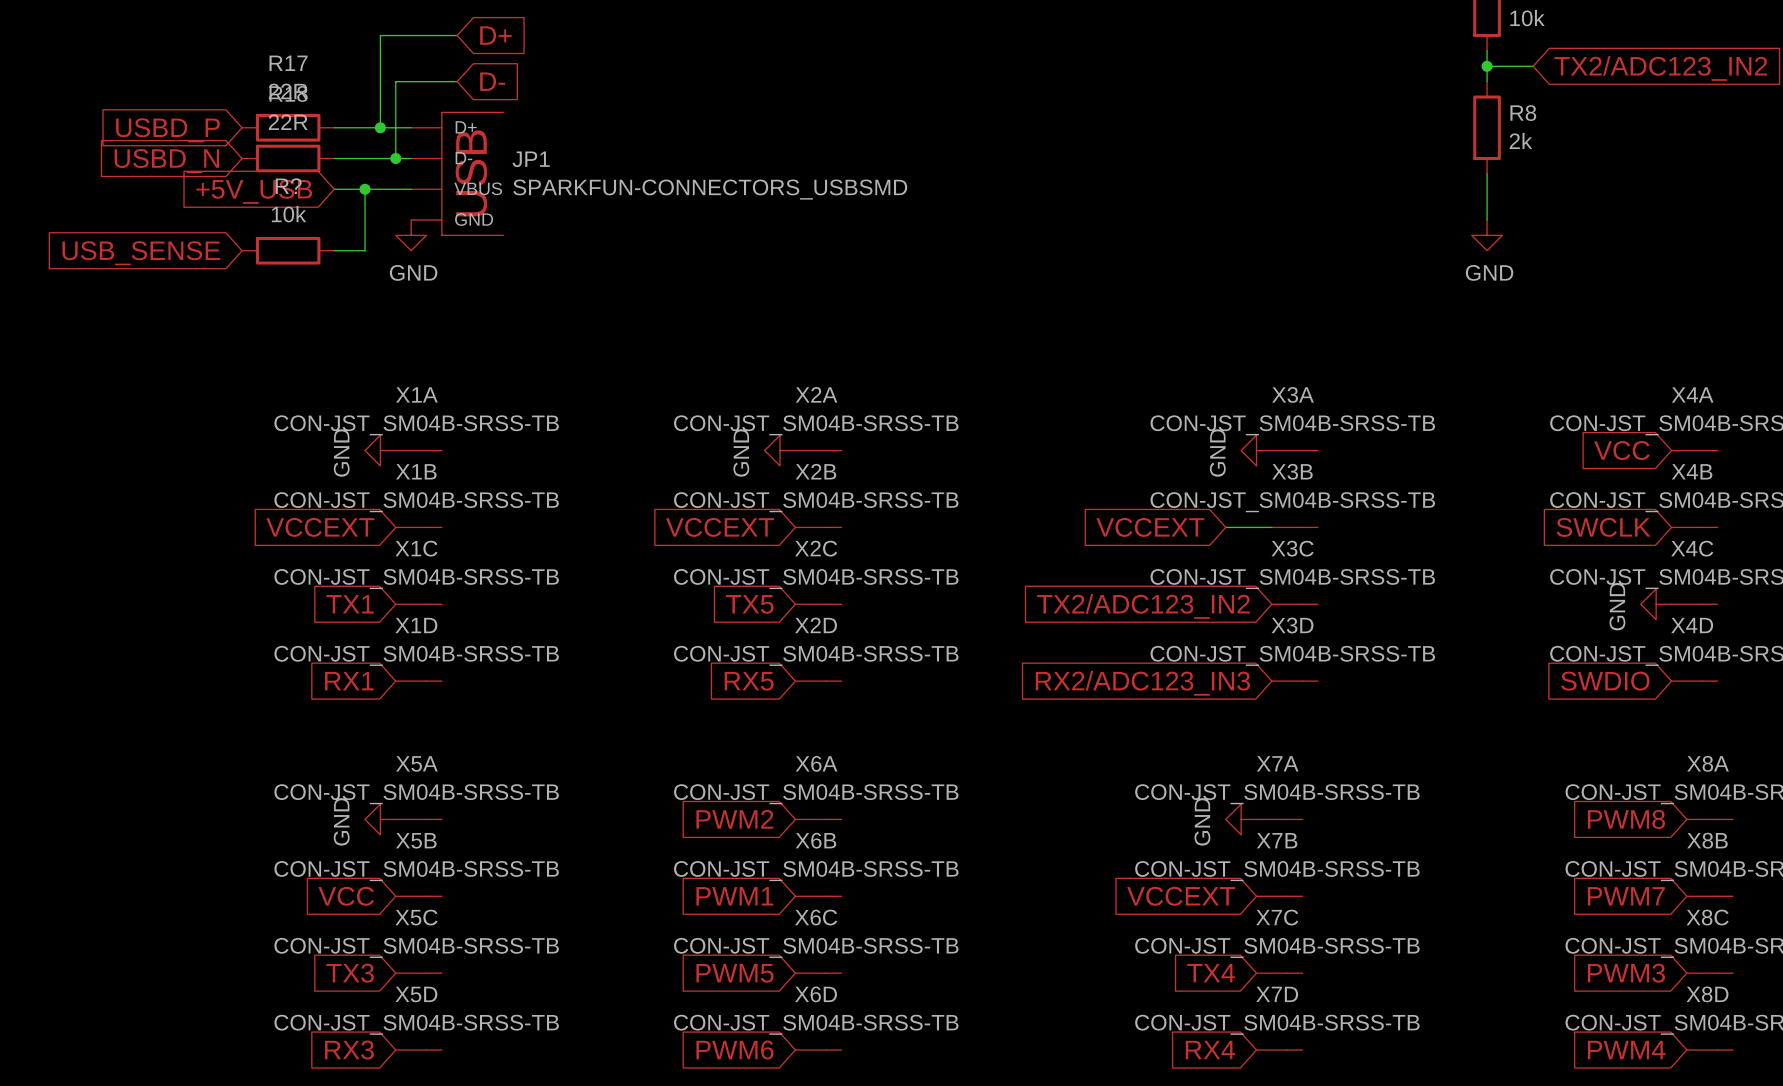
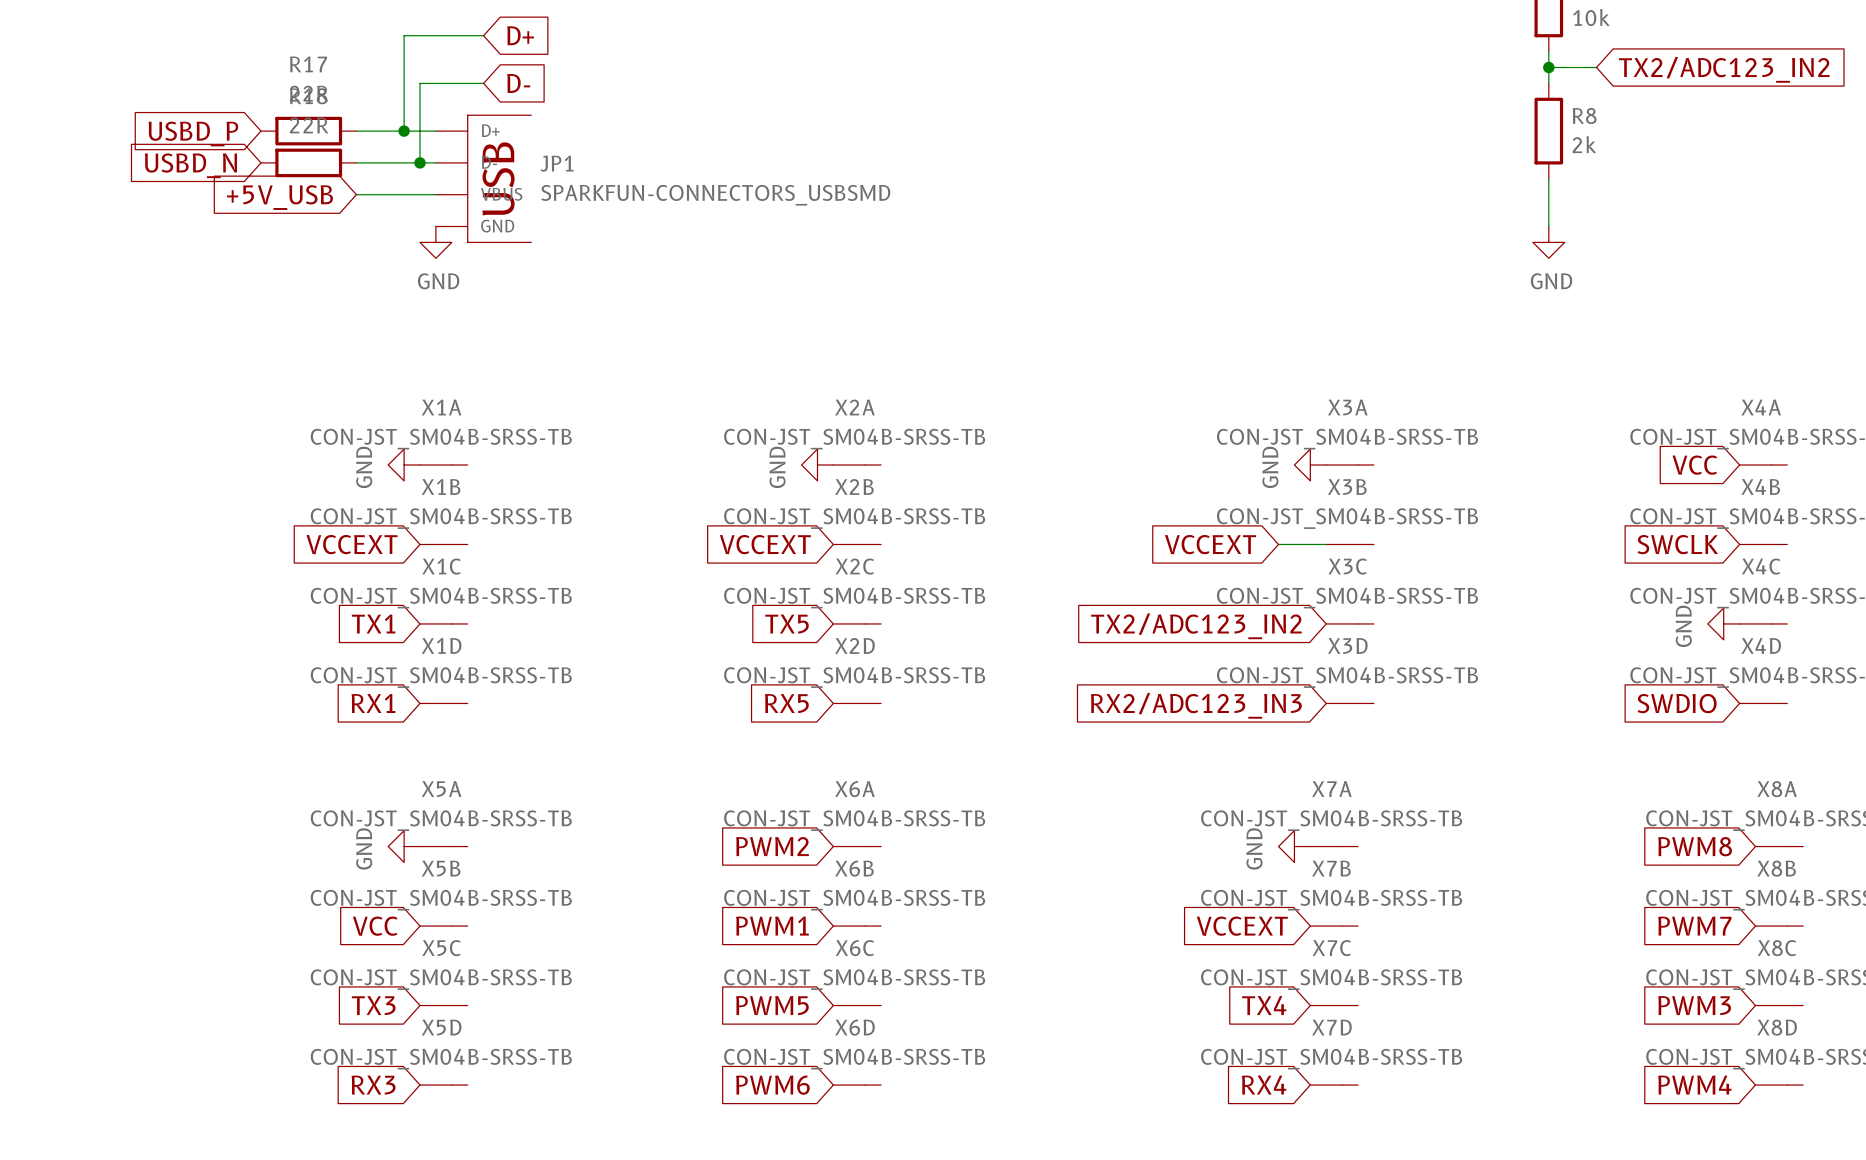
wire: (365, 189) (365, 250) (334, 250) -> none
junction: (365, 189) -> none
R?: 10k (288, 250) -> none
global label: USB_SENSE (141, 253) -> none

